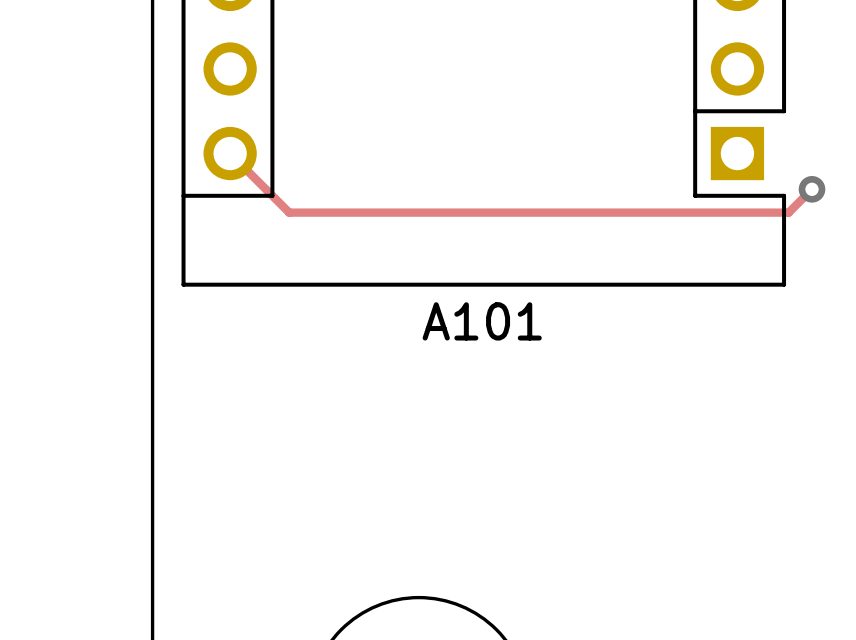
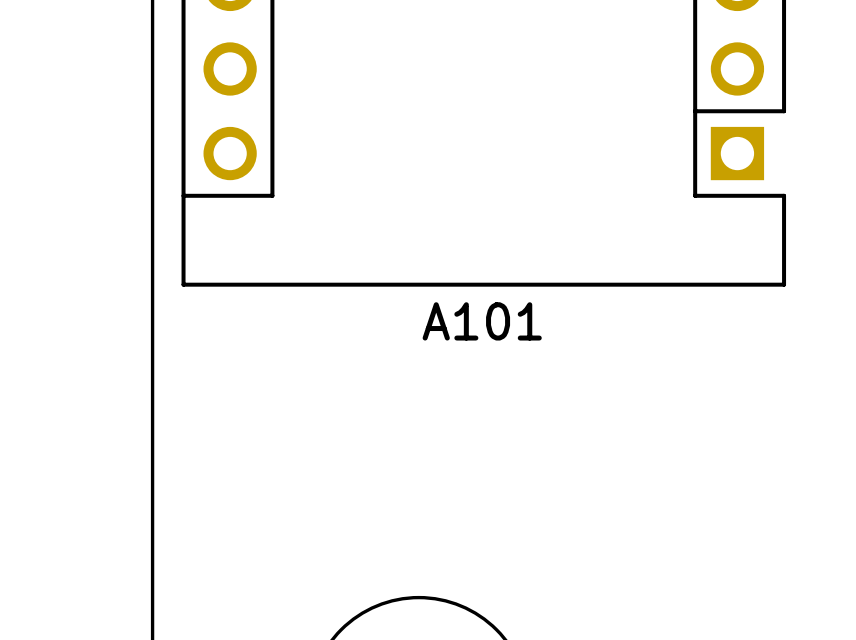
track: (230, 153) (289, 212) (788, 212) (812, 189) -> none
via: (812, 189) -> none

